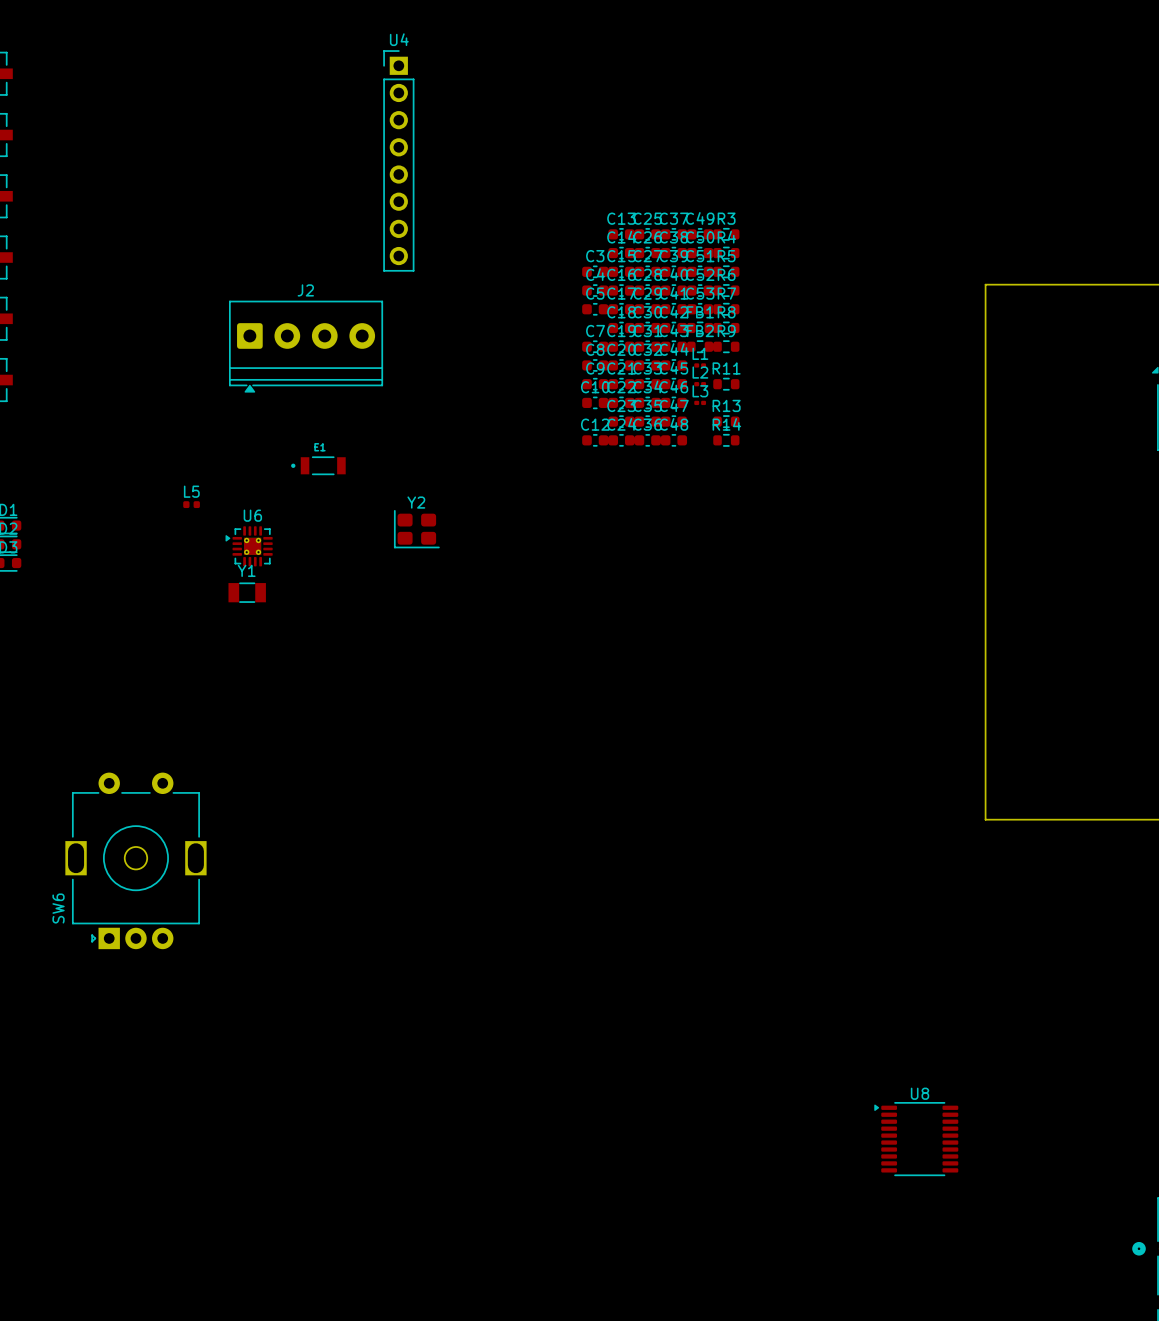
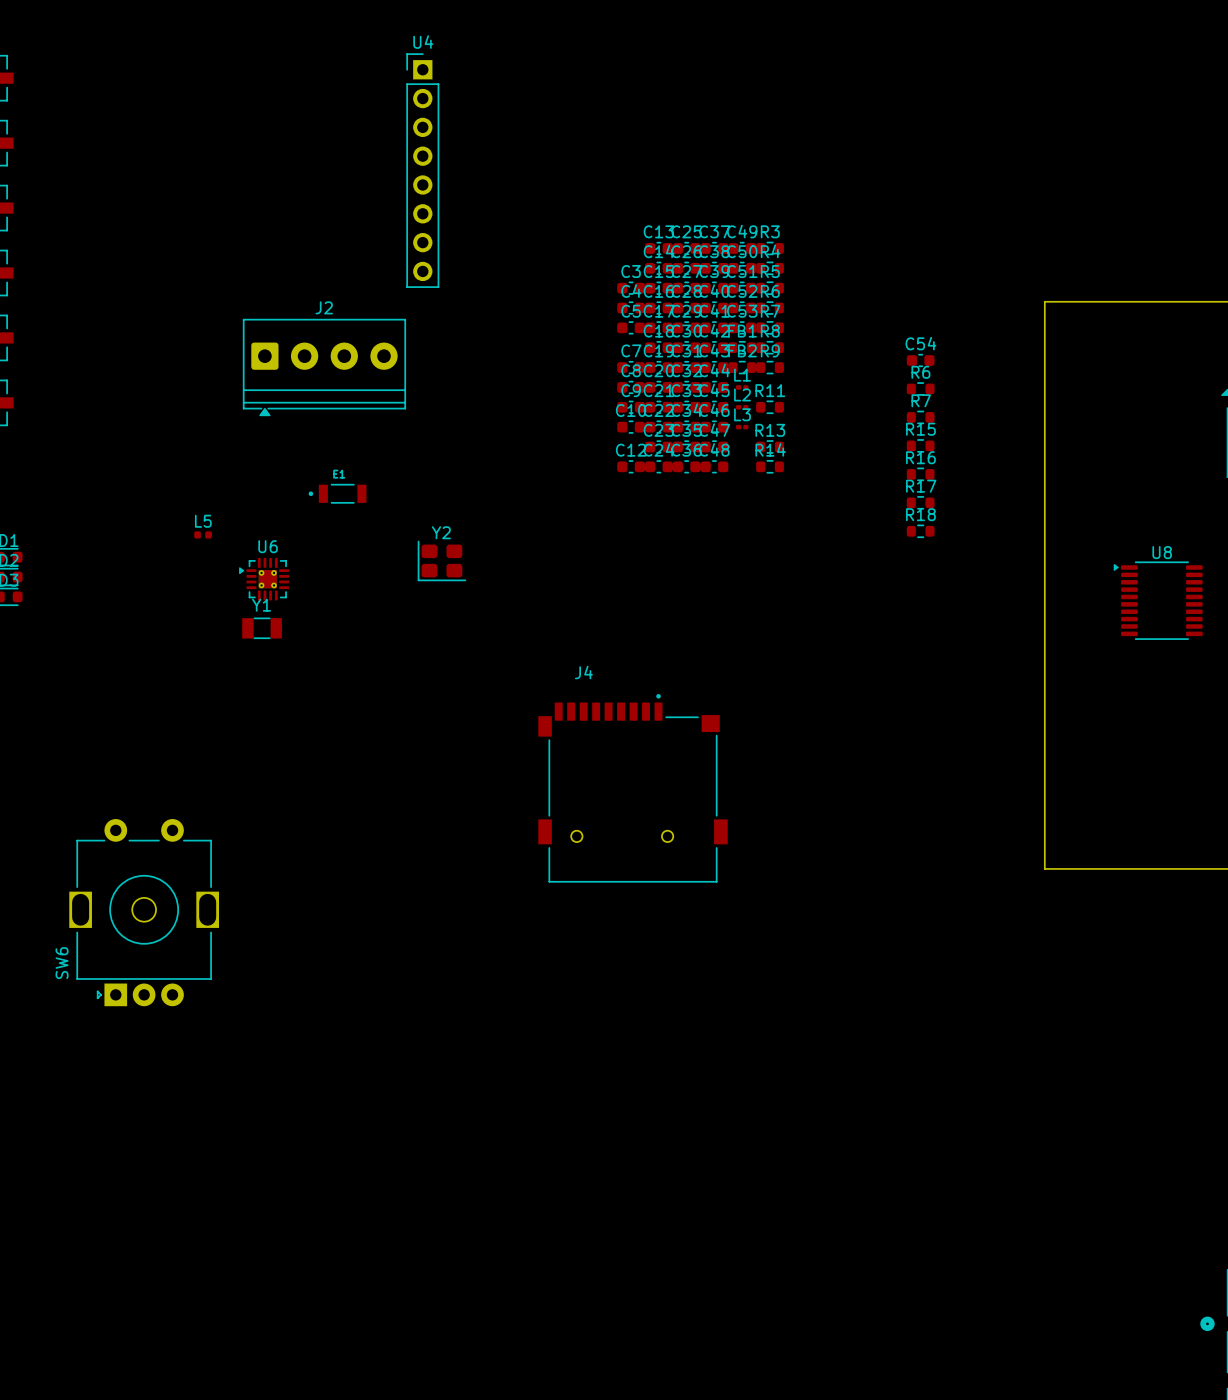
C54: none -> (920, 360)
R6: none -> (920, 388)
R7: none -> (920, 417)
R15: none -> (920, 445)
R16: none -> (920, 474)
R17: none -> (920, 502)
R18: none -> (920, 531)
J4: none -> (632, 788)
U8 position: (916, 1139) -> (1158, 600)

